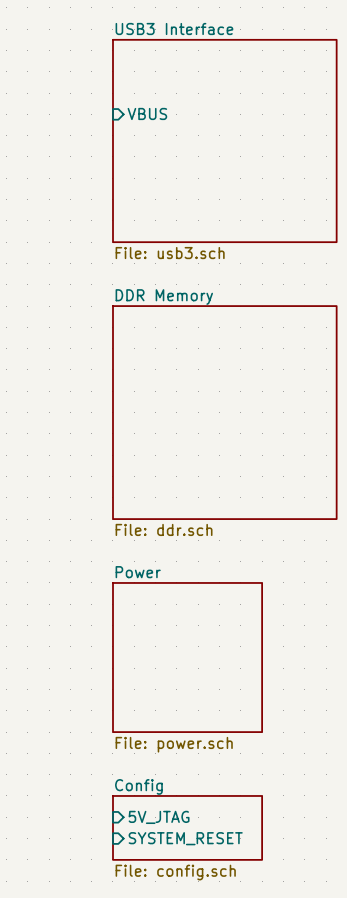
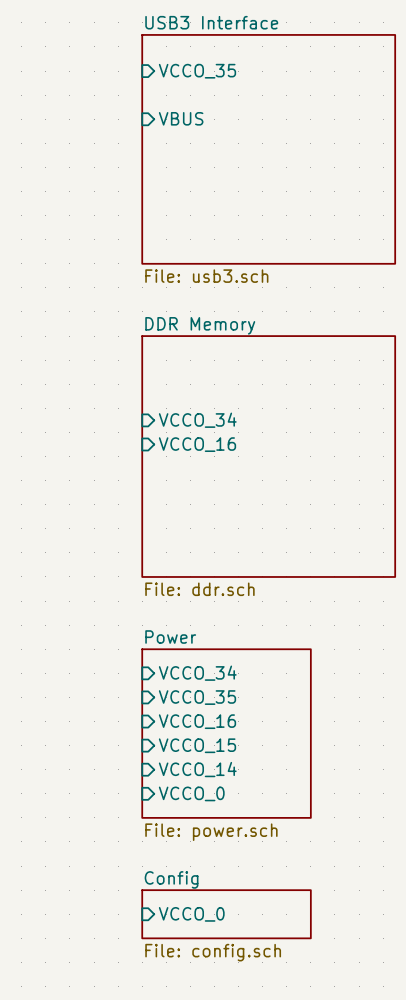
sheet pin: none -> VCCO_35 (197, 71)
sheet pin: none -> VCCO_34 (197, 420)
sheet pin: none -> VCCO_16 (197, 444)
sheet pin: none -> VCCO_34 (197, 673)
sheet pin: none -> VCCO_35 (197, 697)
sheet pin: none -> VCCO_16 (197, 721)
sheet pin: none -> VCCO_15 (197, 745)
sheet pin: none -> VCCO_14 (197, 769)
sheet pin: none -> VCCO_0 (191, 793)
sheet pin: 5V_JTAG (159, 817) -> VCCO_0 (191, 914)
sheet Config: none -> File: config.sch (226, 914)
sheet Config: File: config.sch (187, 827) -> none
sheet pin: SYSTEM_RESET (185, 838) -> none

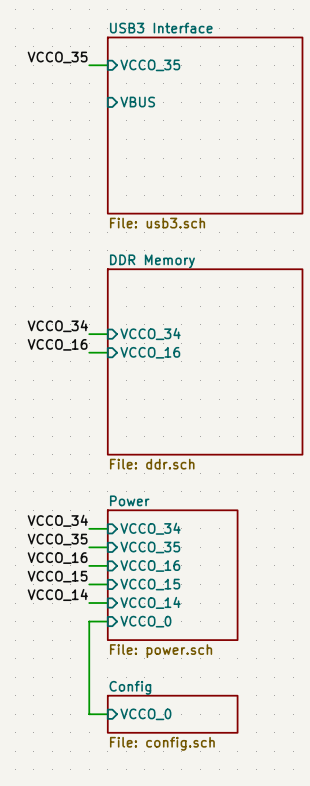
label: none -> VCCO_35 (57, 57)
wire: none -> (89, 65) (107, 65)
label: none -> VCCO_34 (57, 326)
wire: none -> (89, 334) (107, 334)
label: none -> VCCO_16 (57, 344)
wire: none -> (89, 352) (107, 352)
label: none -> VCCO_34 (57, 520)
wire: none -> (89, 528) (107, 528)
label: none -> VCCO_35 (57, 539)
wire: none -> (89, 547) (107, 547)
label: none -> VCCO_16 (57, 558)
wire: none -> (89, 565) (107, 565)
label: none -> VCCO_15 (57, 576)
wire: none -> (89, 584) (107, 584)
label: none -> VCCO_14 (57, 594)
wire: none -> (89, 603) (107, 603)
wire: none -> (107, 621) (89, 621) (89, 714) (107, 714)

